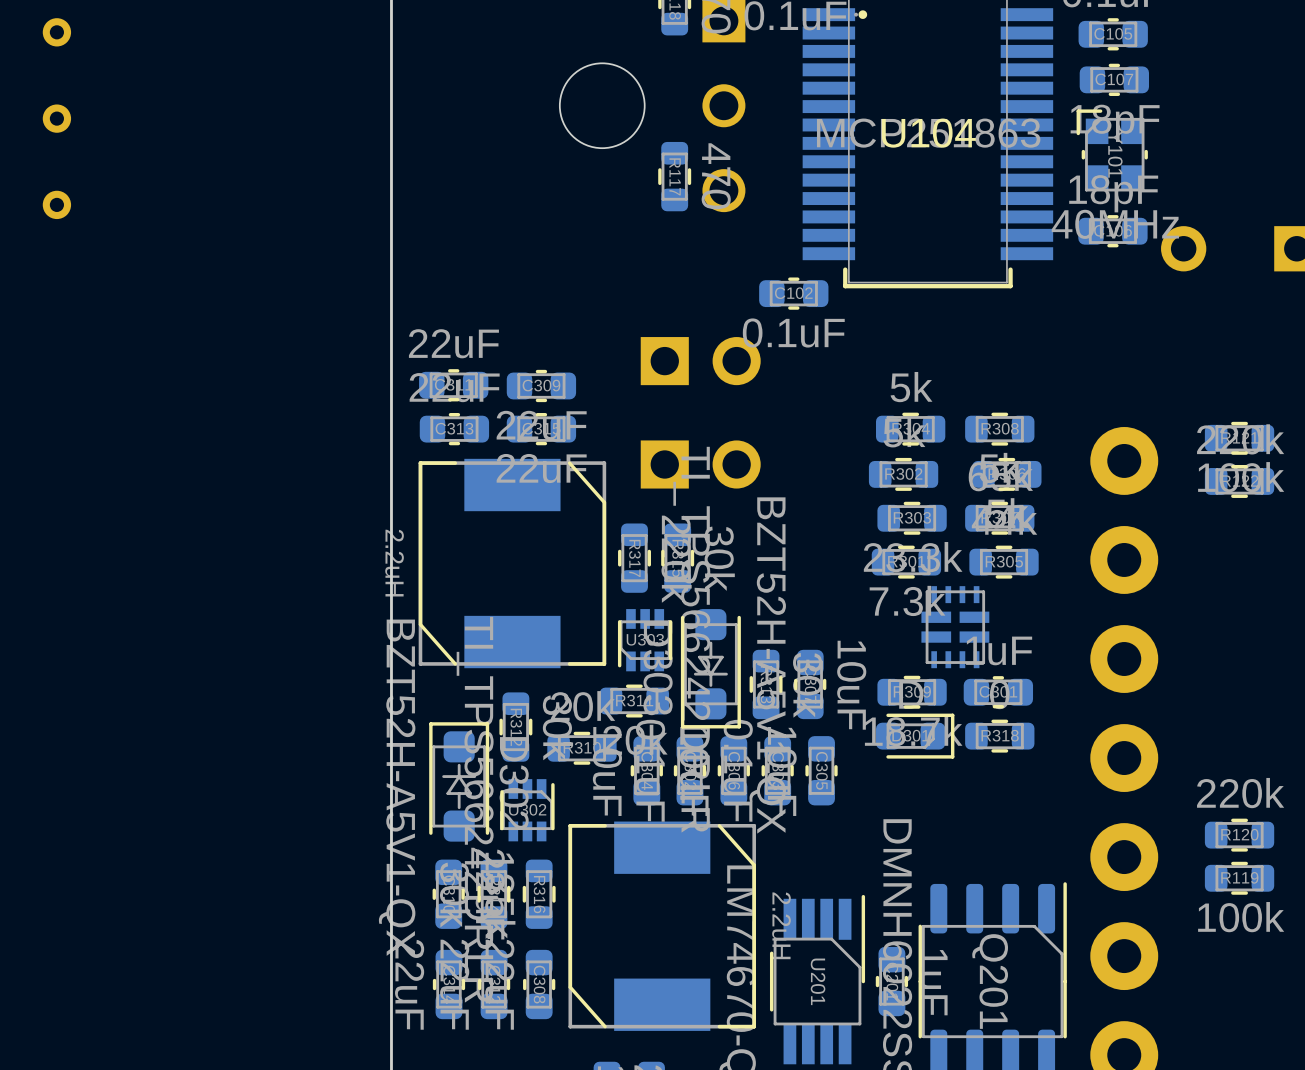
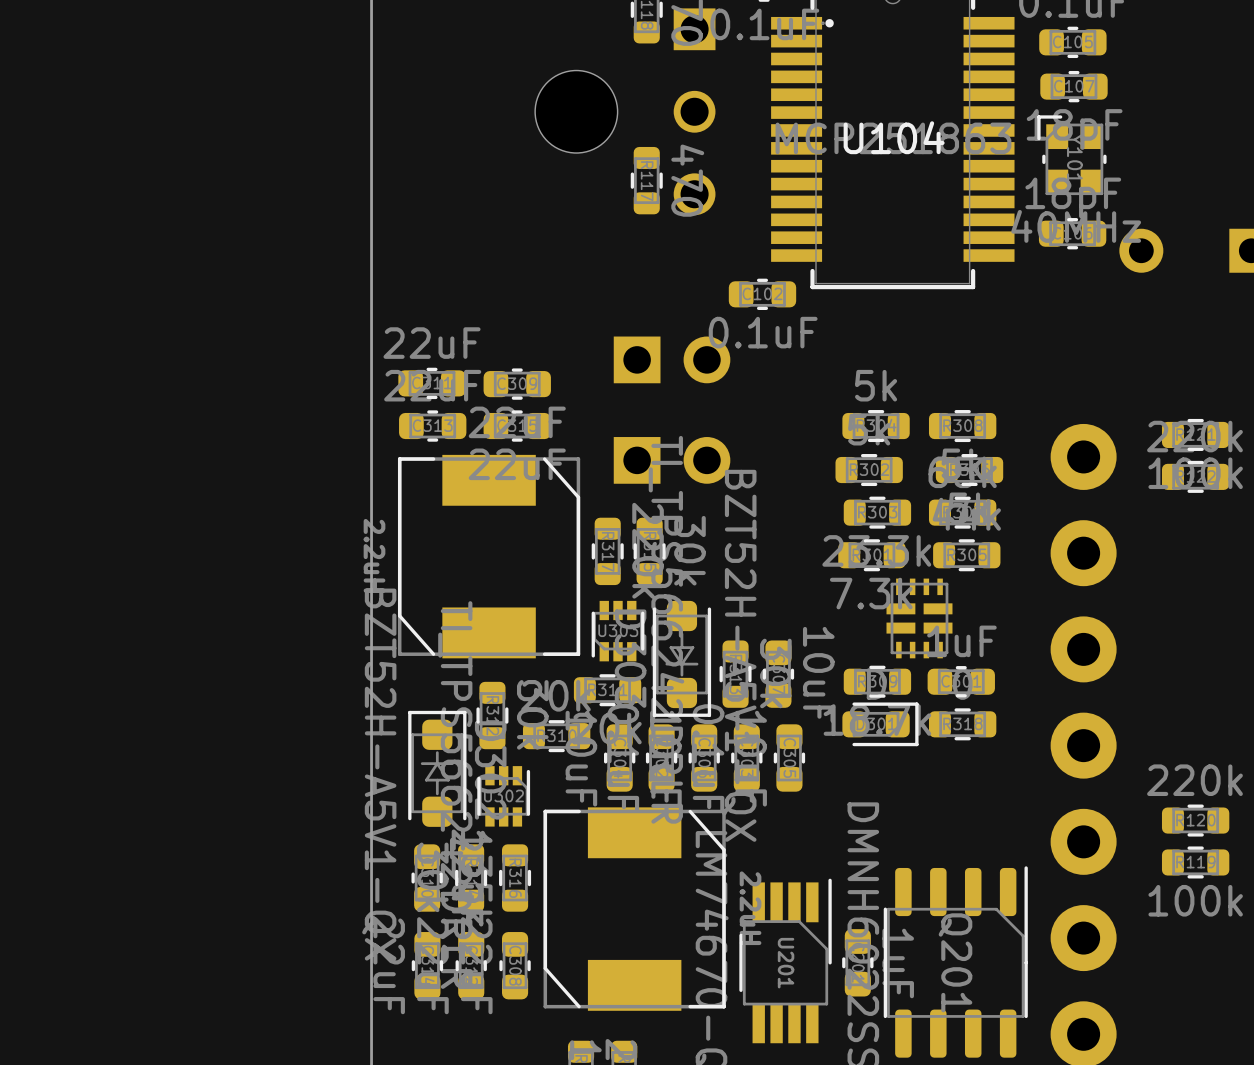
part: (56, 32) -> none
part: (56, 118) -> none
part: (56, 204) -> none

